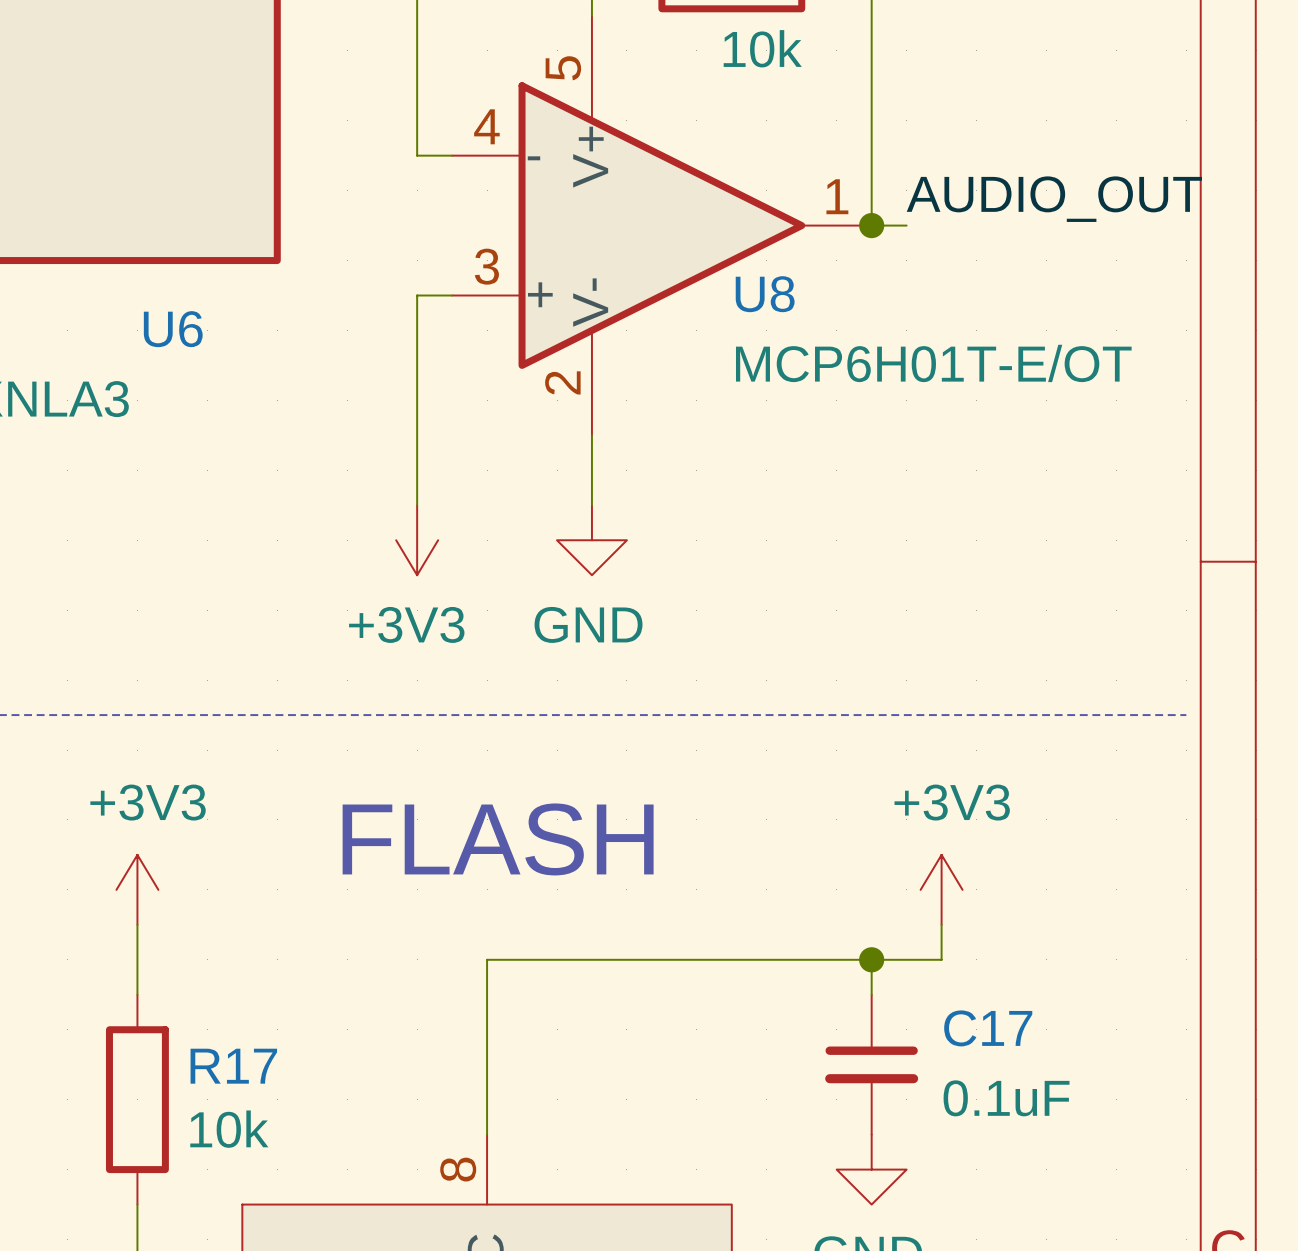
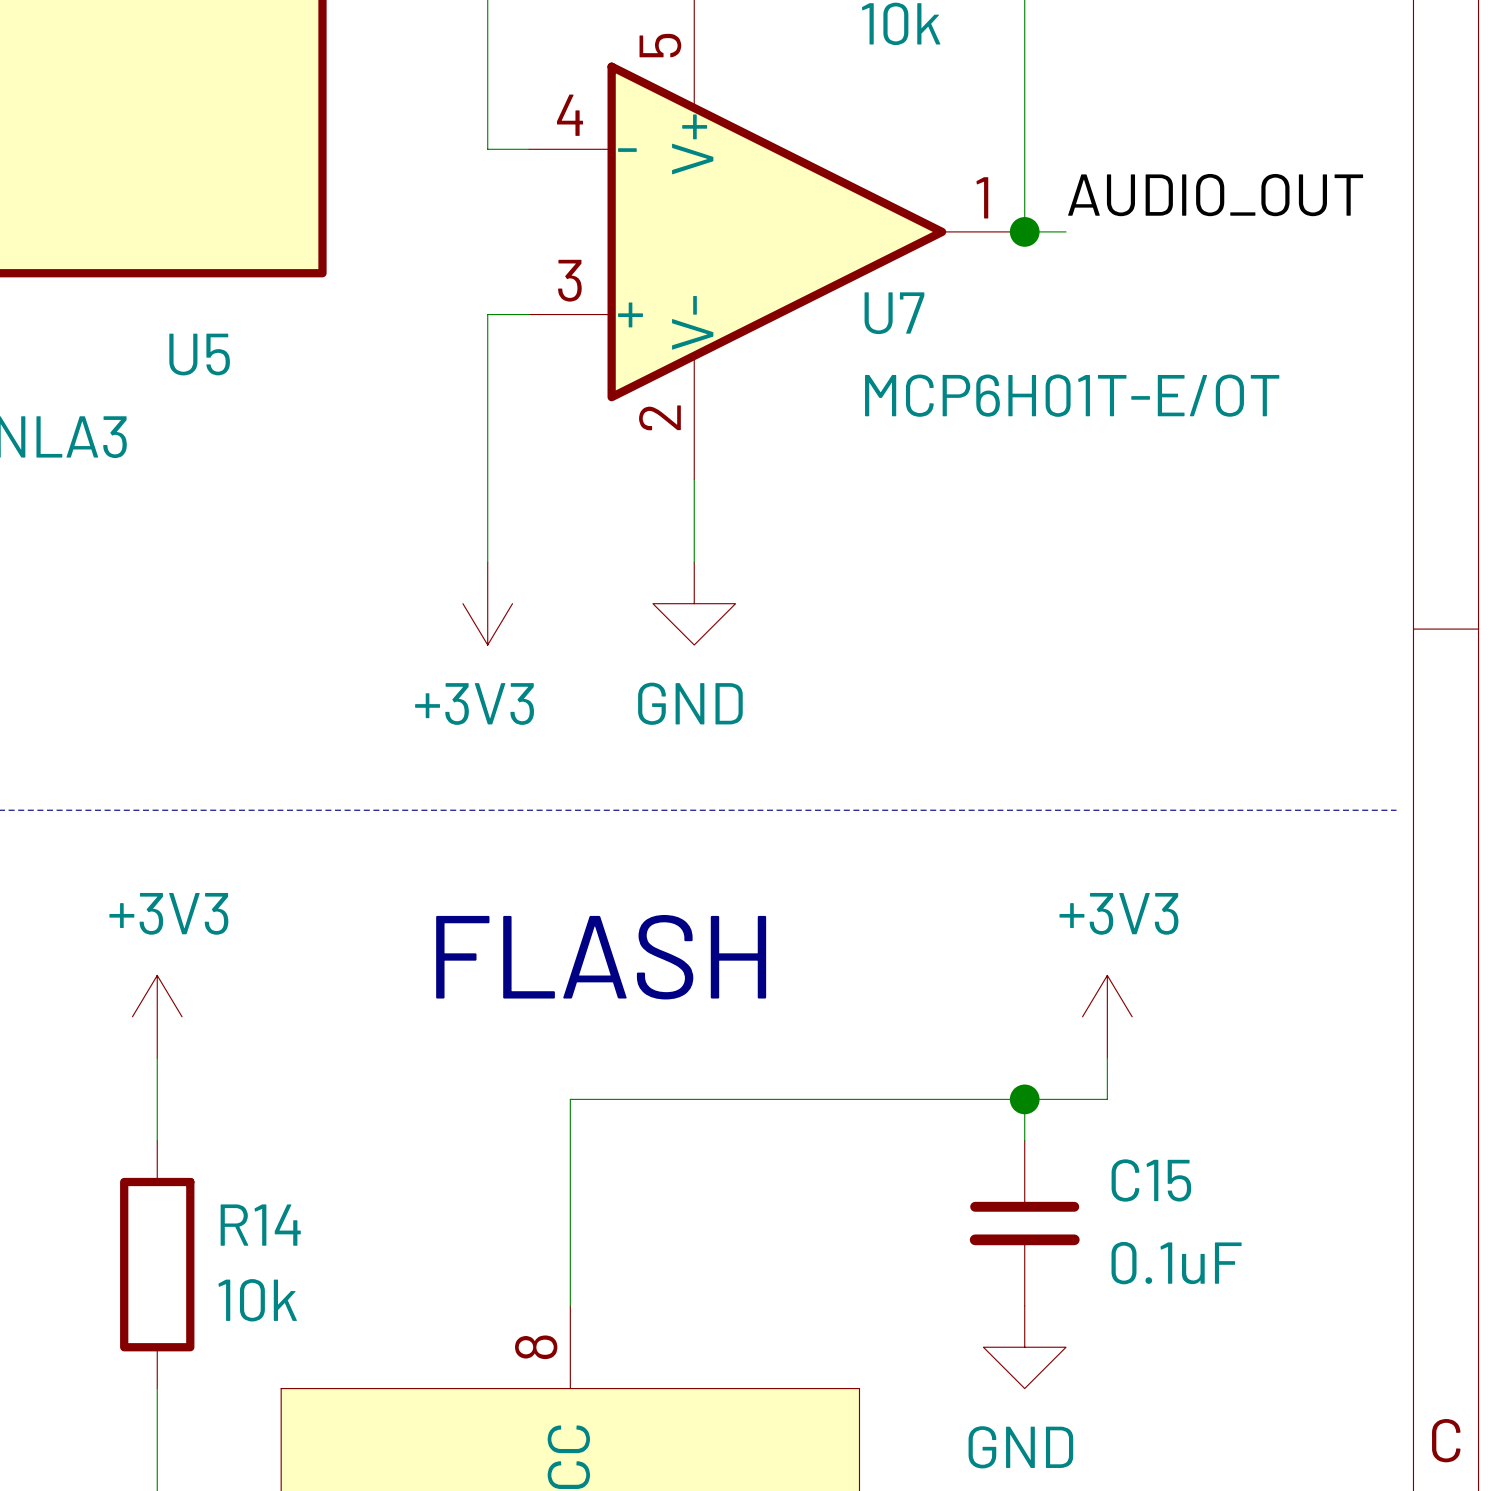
U8 name: U8 (765, 294) -> U7 (894, 313)
U6 name: U6 (173, 329) -> U5 (199, 354)
C17 name: C17 (988, 1028) -> C15 (1151, 1180)
R17 name: R17 (233, 1066) -> R14 (260, 1225)

